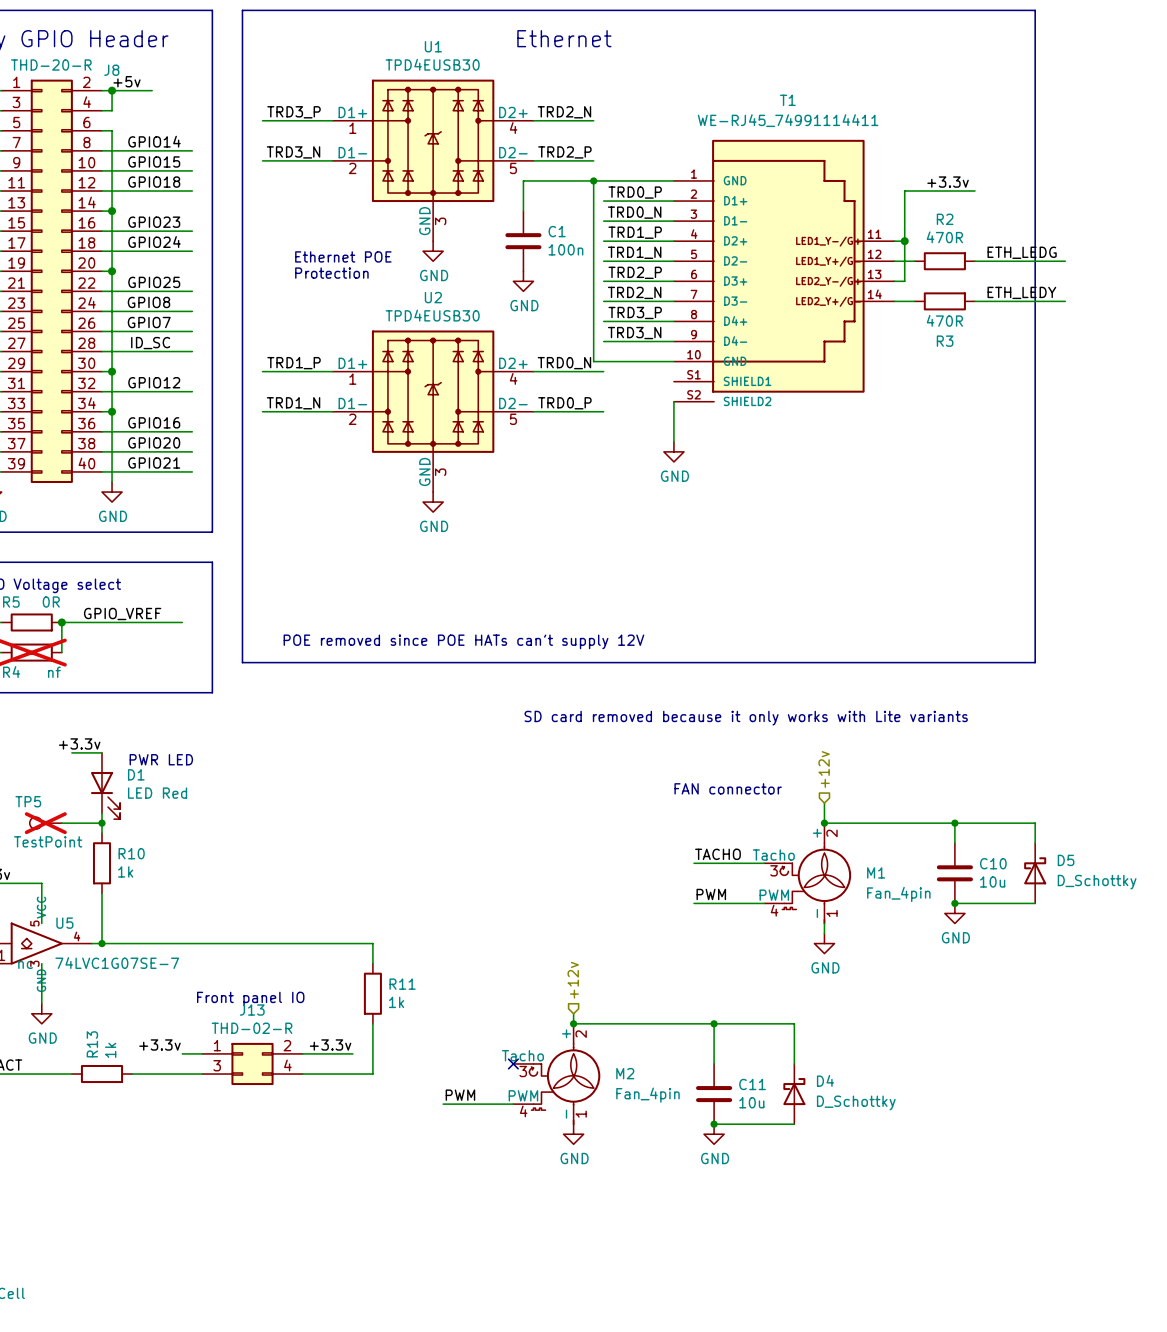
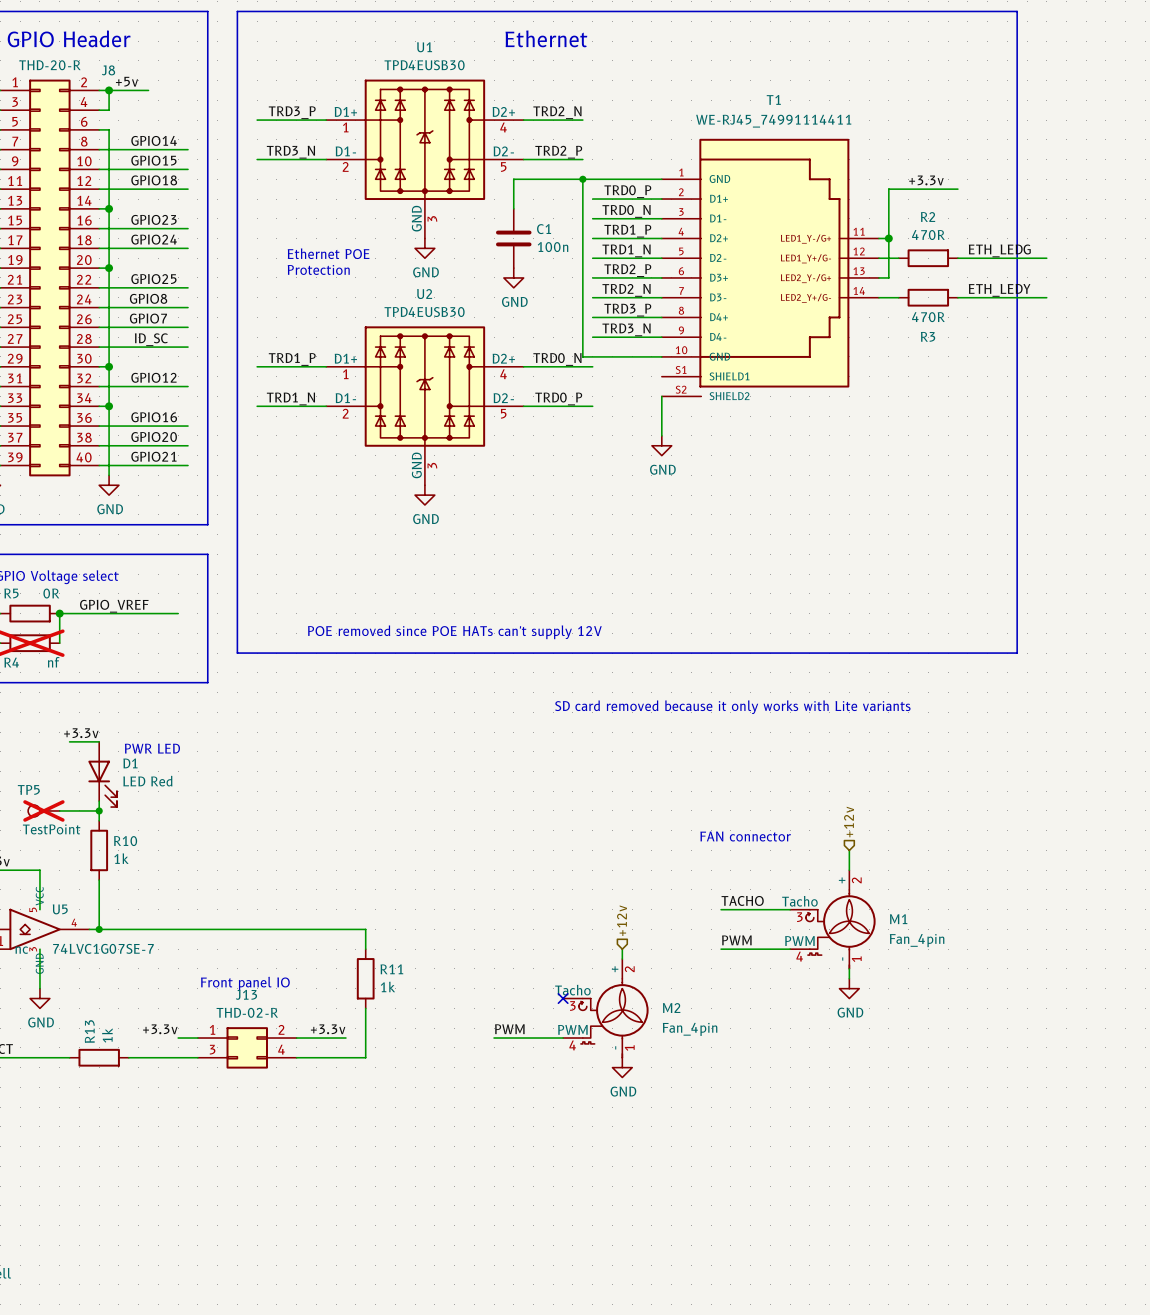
hierarchical label position: +12v (824, 769) -> +12v (849, 822)
text position: FAN connector (728, 788) -> FAN connector (745, 836)
wire: (824, 803) (824, 823) (1035, 823) (1035, 843) -> none
junction: (824, 823) -> none
wire: (954, 823) (954, 843) -> (849, 850) (849, 870)
junction: (954, 823) -> none
label position: TACHO (717, 854) -> TACHO (742, 900)
wire: (694, 863) (764, 863) -> (721, 909) (790, 909)
M1 position: (807, 873) -> (832, 919)
C10: 10u (954, 873) -> none
D5: D_Schottky (1035, 873) -> none
label position: PWM (711, 894) -> PWM (736, 940)
wire: (694, 903) (764, 903) -> (721, 949) (790, 949)
wire: (954, 903) (1035, 903) -> none
junction: (954, 903) -> none
power symbol: GND (954, 913) -> none
wire: (824, 923) (824, 933) -> (849, 968) (849, 978)
power symbol: GND (824, 943) -> none
wire: none -> (622, 949) (622, 959)
hierarchical label position: +12v (573, 980) -> +12v (622, 920)
power symbol: none -> GND (849, 988)
wire: (573, 1013) (573, 1023) (794, 1023) (794, 1063) -> none
no-connect mark: none -> (563, 998)
junction: (573, 1023) -> none
wire: (714, 1023) (714, 1063) -> none
junction: (714, 1023) -> none
no-connect mark: (513, 1063) -> none
M2 position: (556, 1074) -> (605, 1008)
power symbol: none -> GND (622, 1067)
C11: 10u (714, 1094) -> none
D4: D_Schottky (794, 1094) -> none
label position: PWM (460, 1095) -> PWM (509, 1029)
wire: (443, 1104) (513, 1104) -> (494, 1038) (563, 1038)
wire: (714, 1124) (794, 1124) -> none
junction: (714, 1124) -> none
power symbol: GND (573, 1134) -> none
power symbol: GND (714, 1134) -> none

